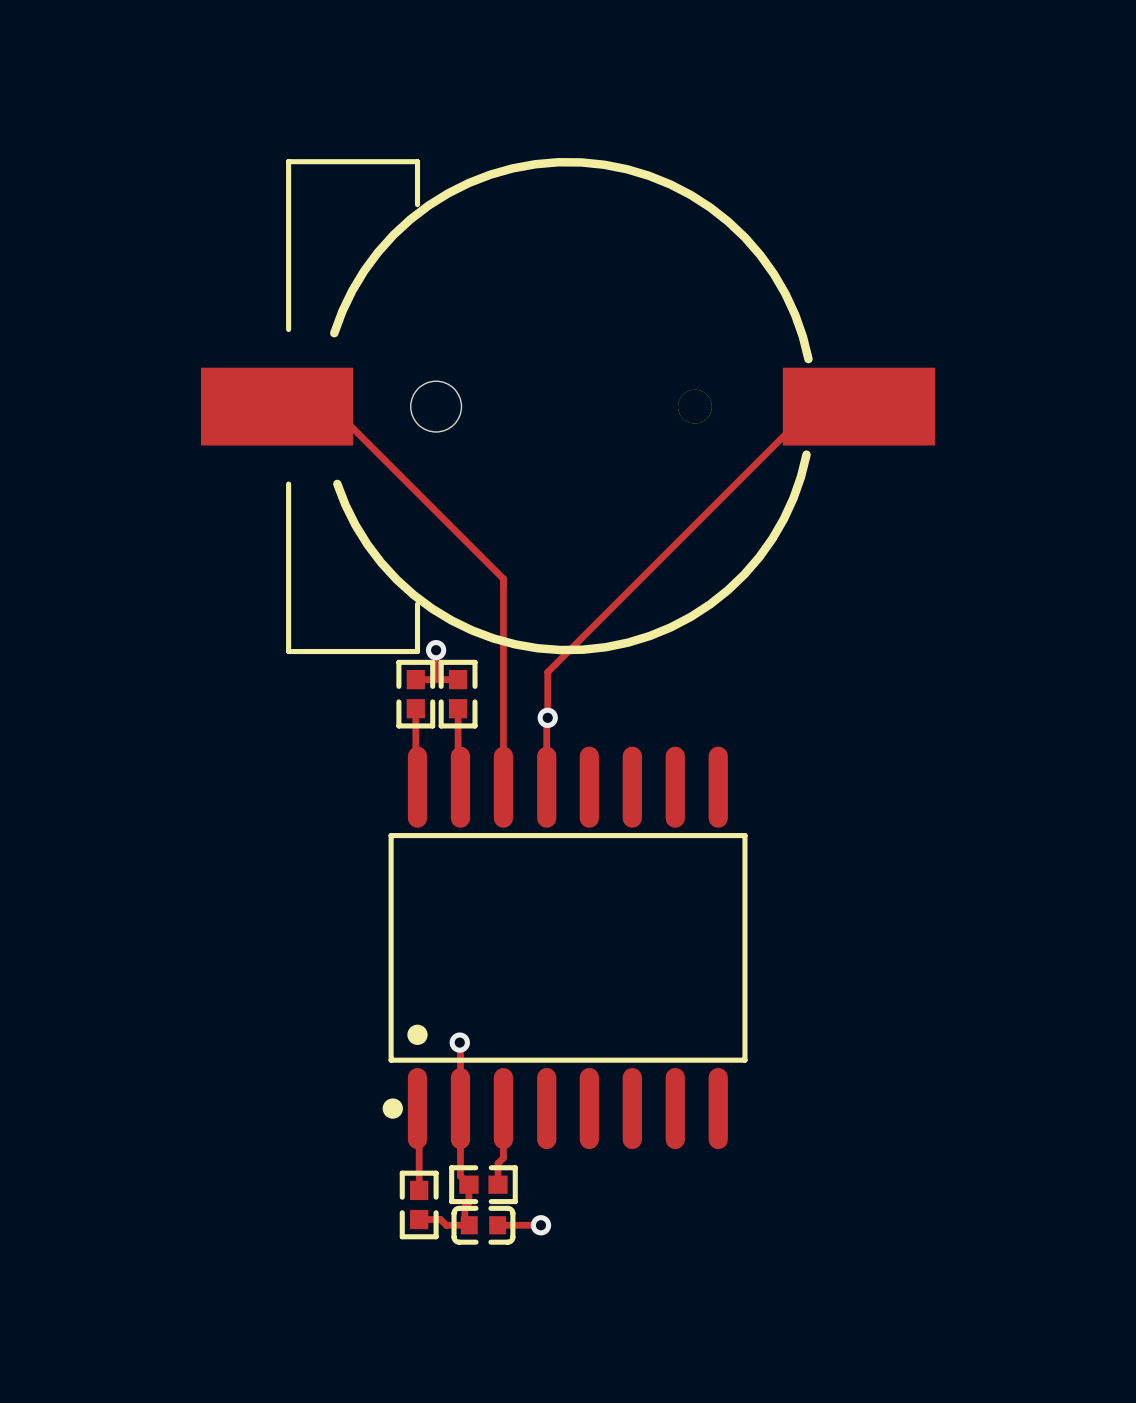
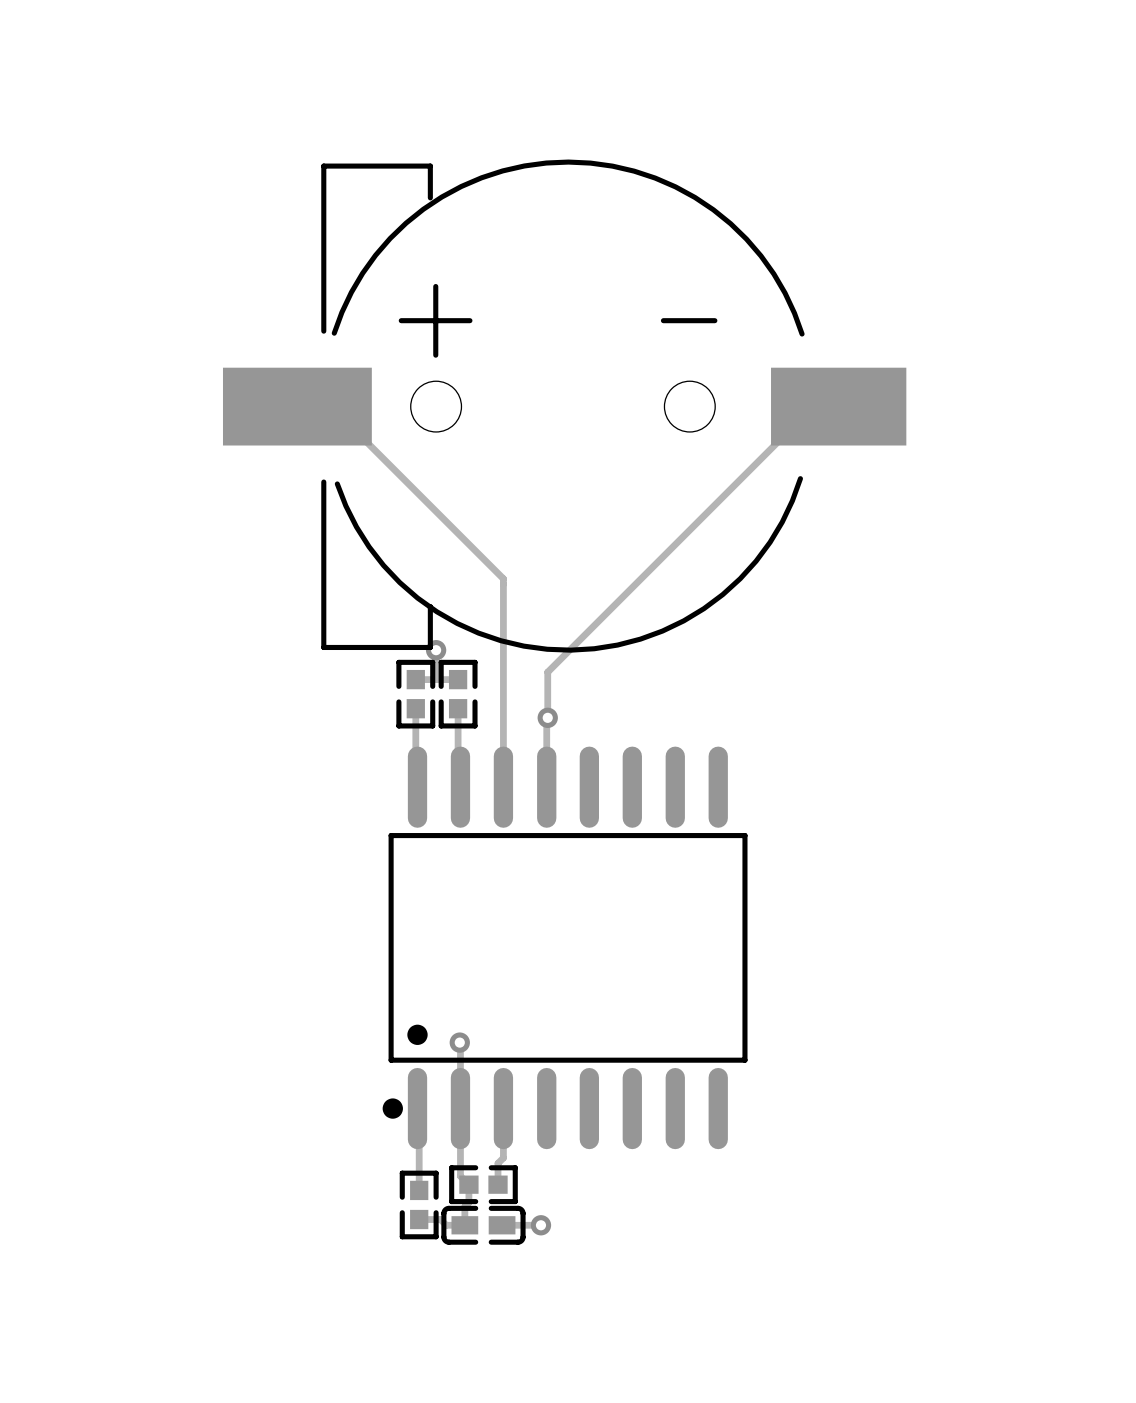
part footprint: [200, 158, 936, 655] -> [222, 159, 907, 653]
part footprint: [451, 1205, 516, 1245] -> [441, 1205, 526, 1245]

